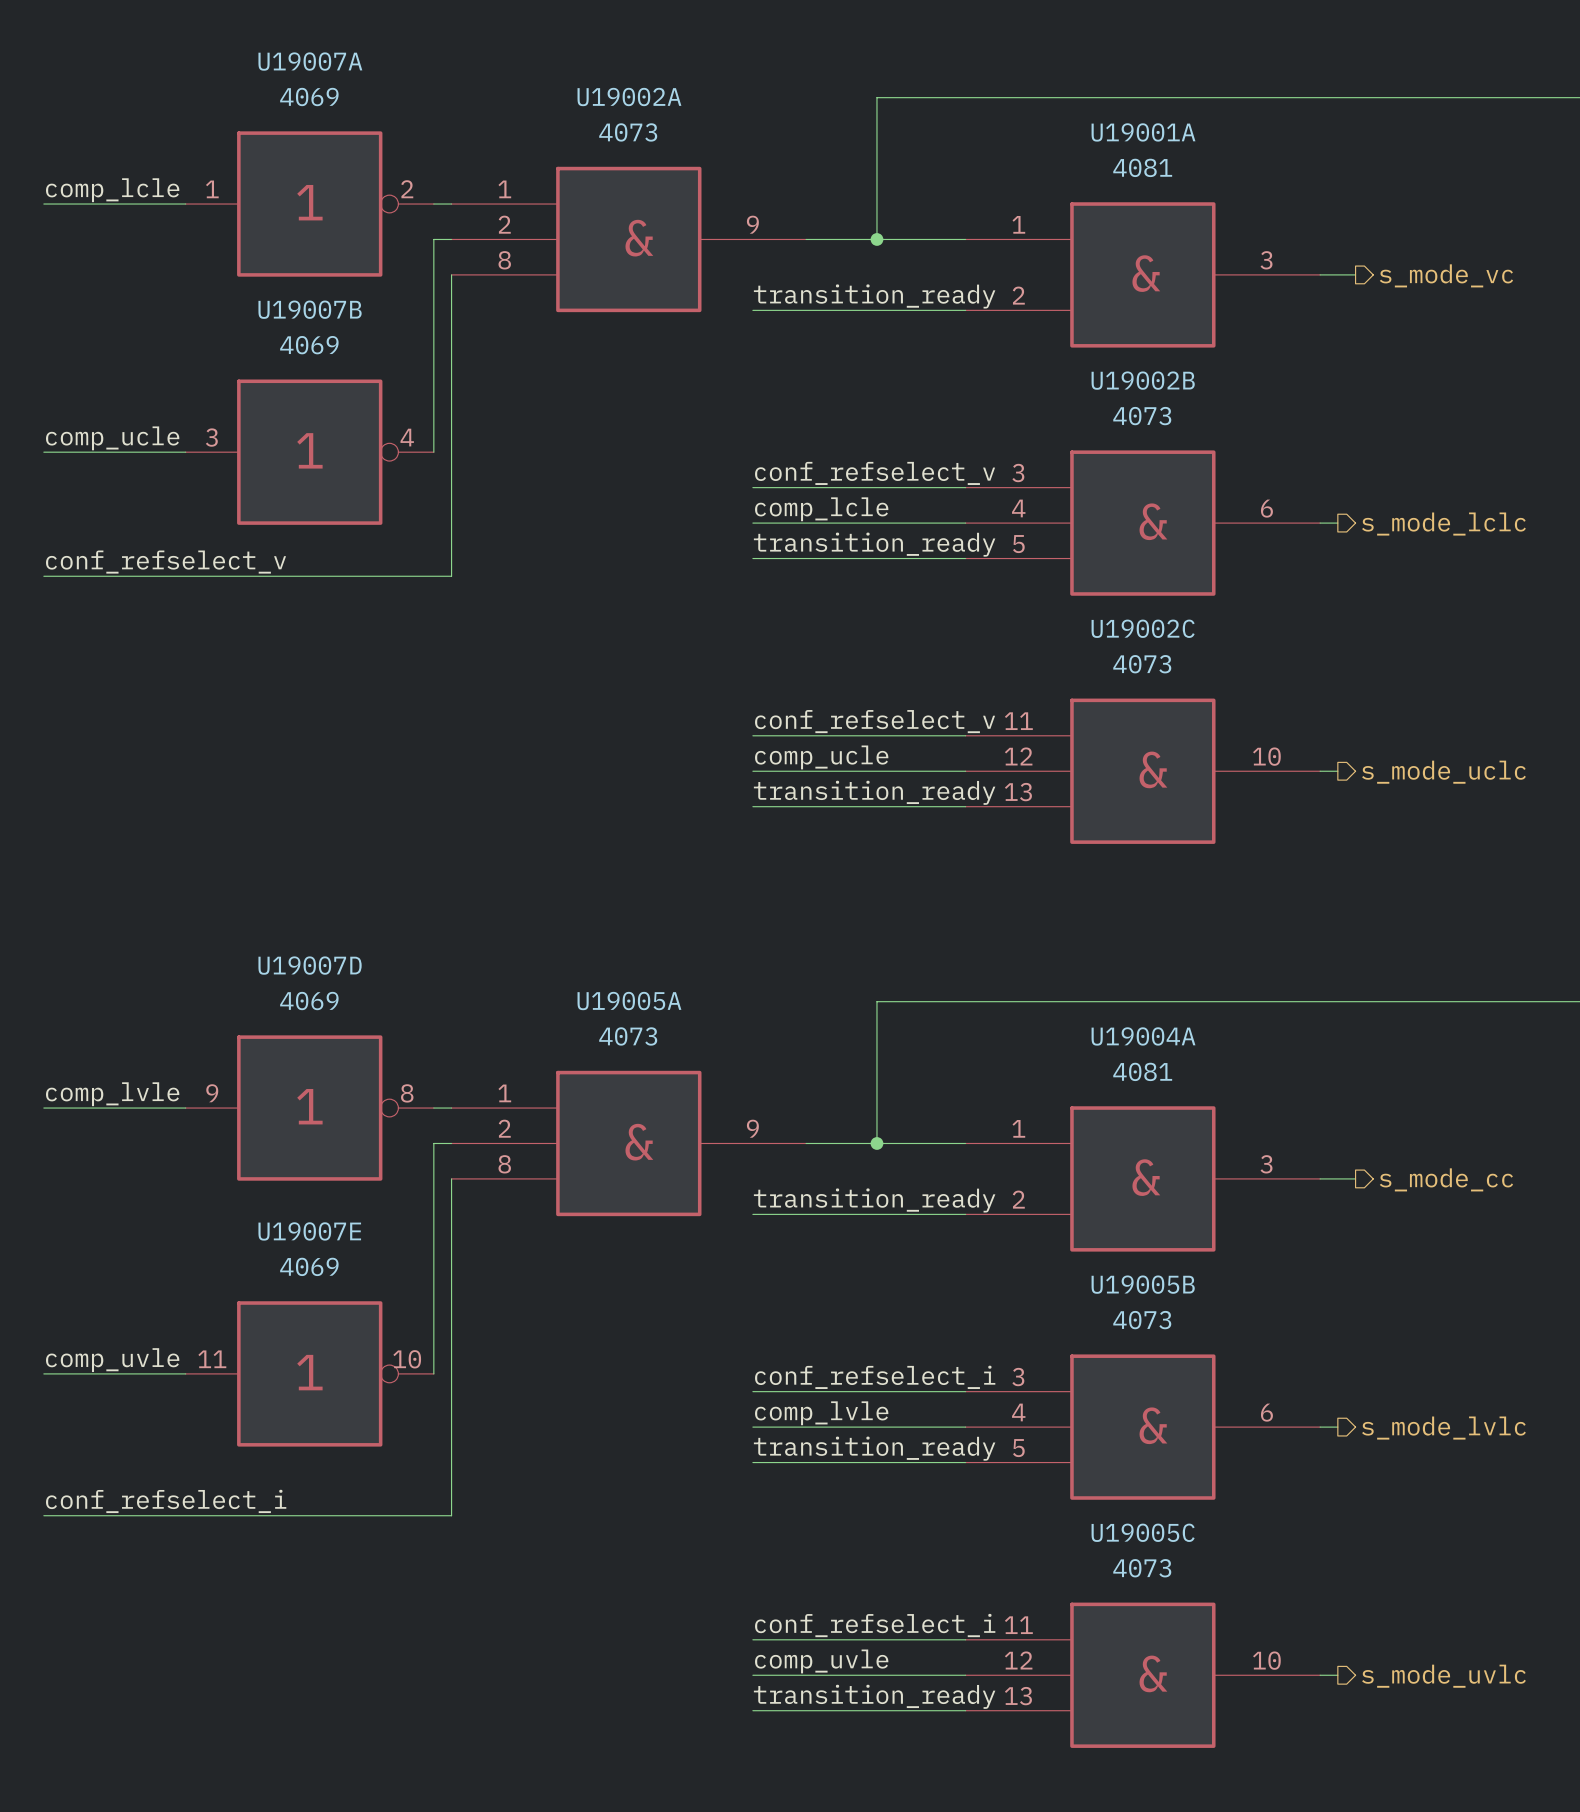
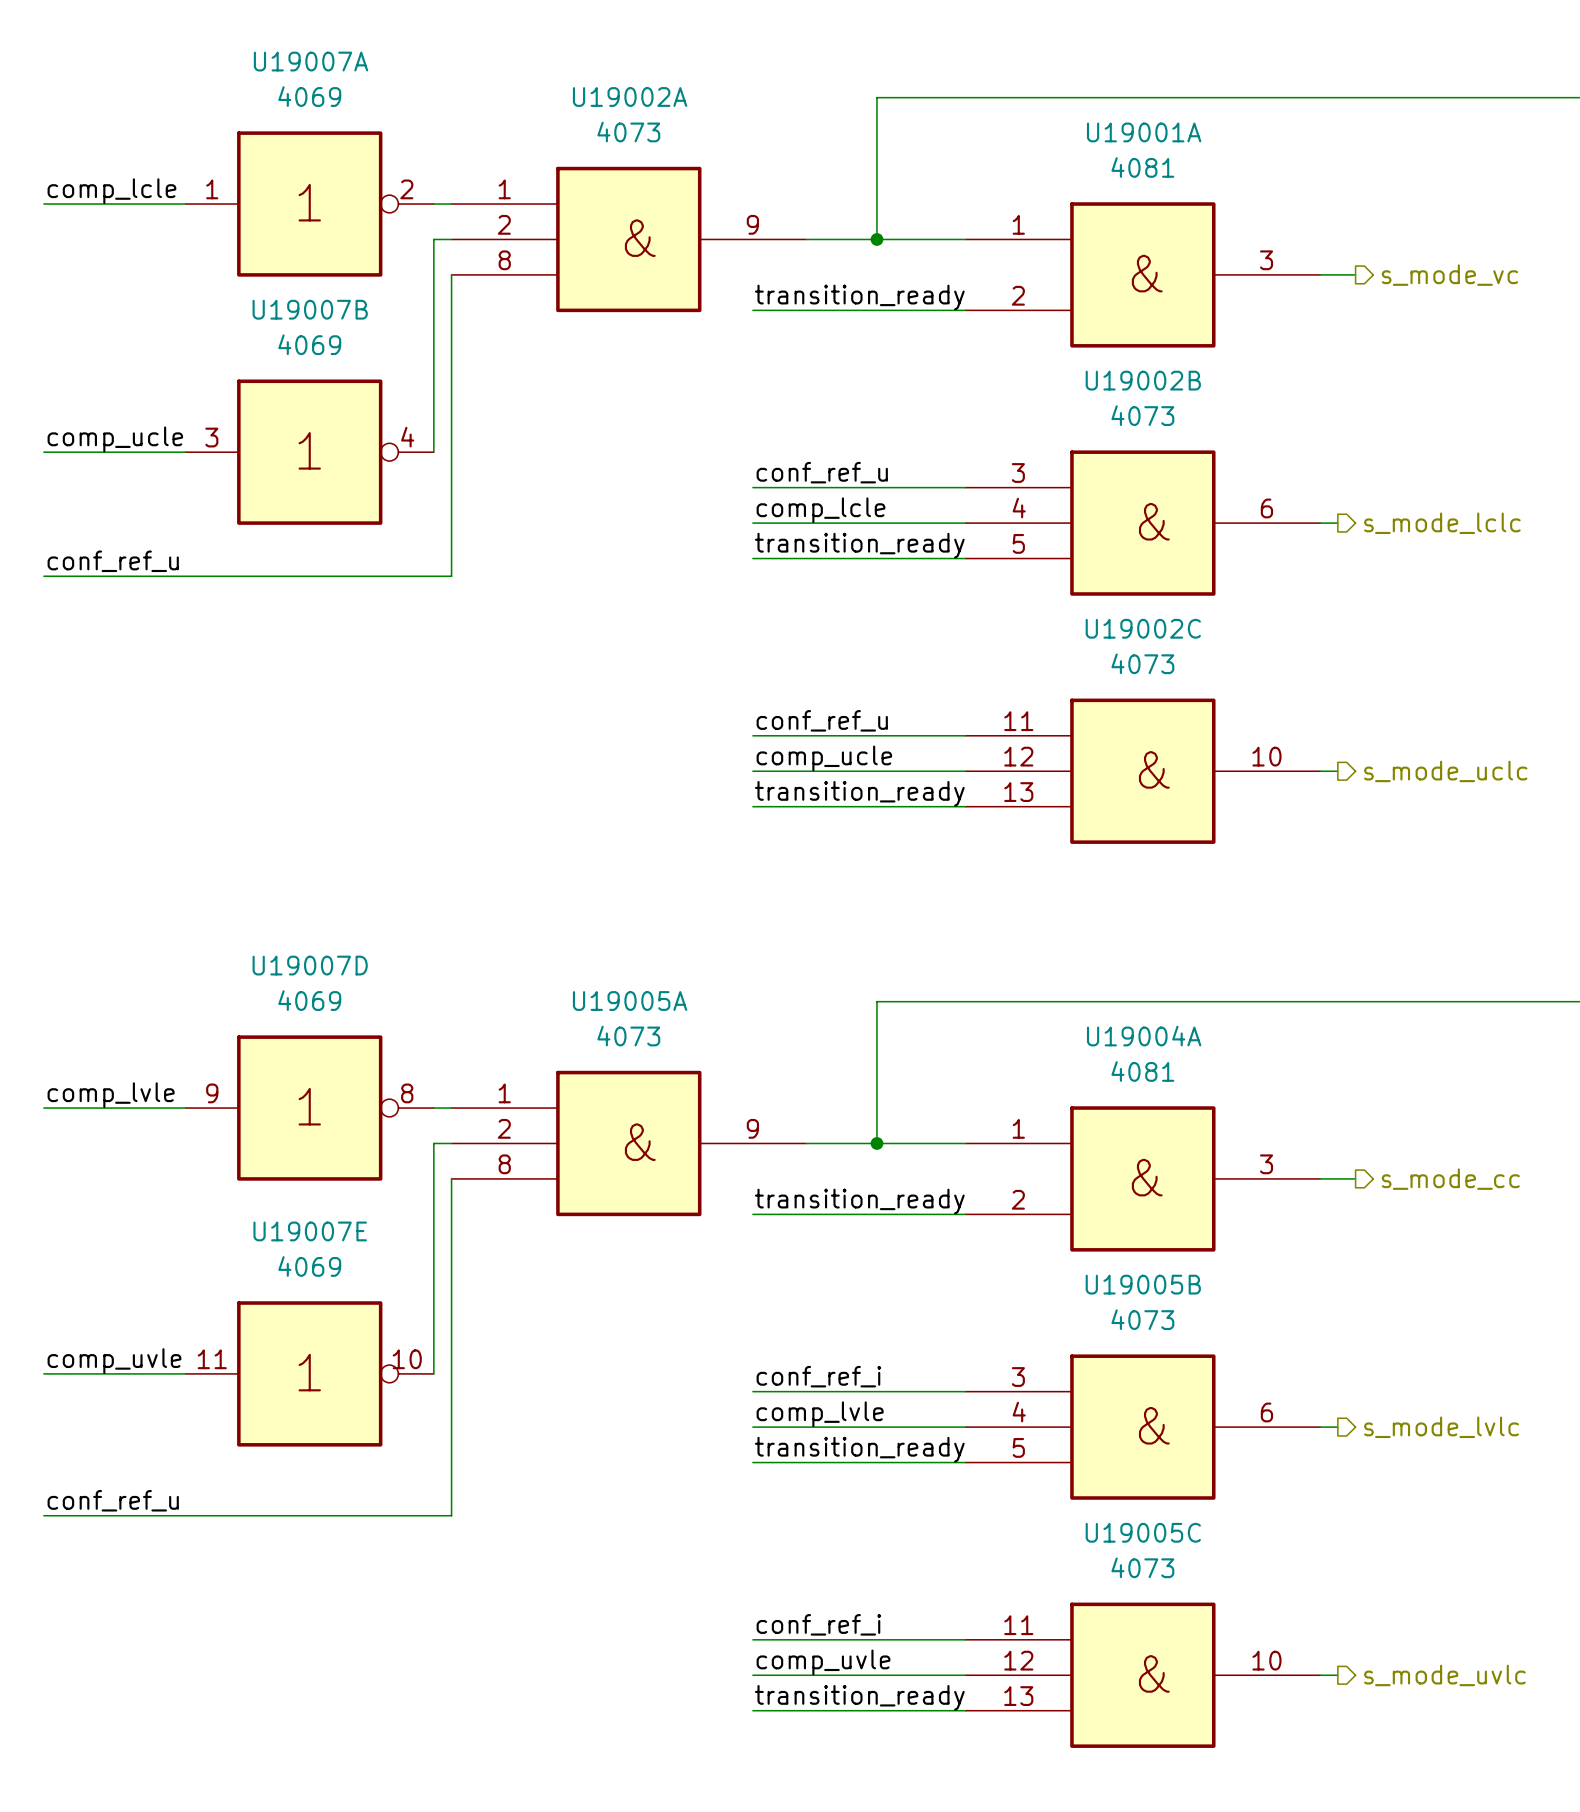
label: conf_refselect_v (875, 473) -> conf_ref_u (822, 472)
label: conf_refselect_v (166, 562) -> conf_ref_u (113, 561)
label: conf_refselect_v (875, 721) -> conf_ref_u (822, 720)
label: conf_refselect_i (875, 1377) -> conf_ref_i (818, 1376)
label: conf_refselect_i (166, 1501) -> conf_ref_u (113, 1500)
label: conf_refselect_i (875, 1625) -> conf_ref_i (818, 1624)

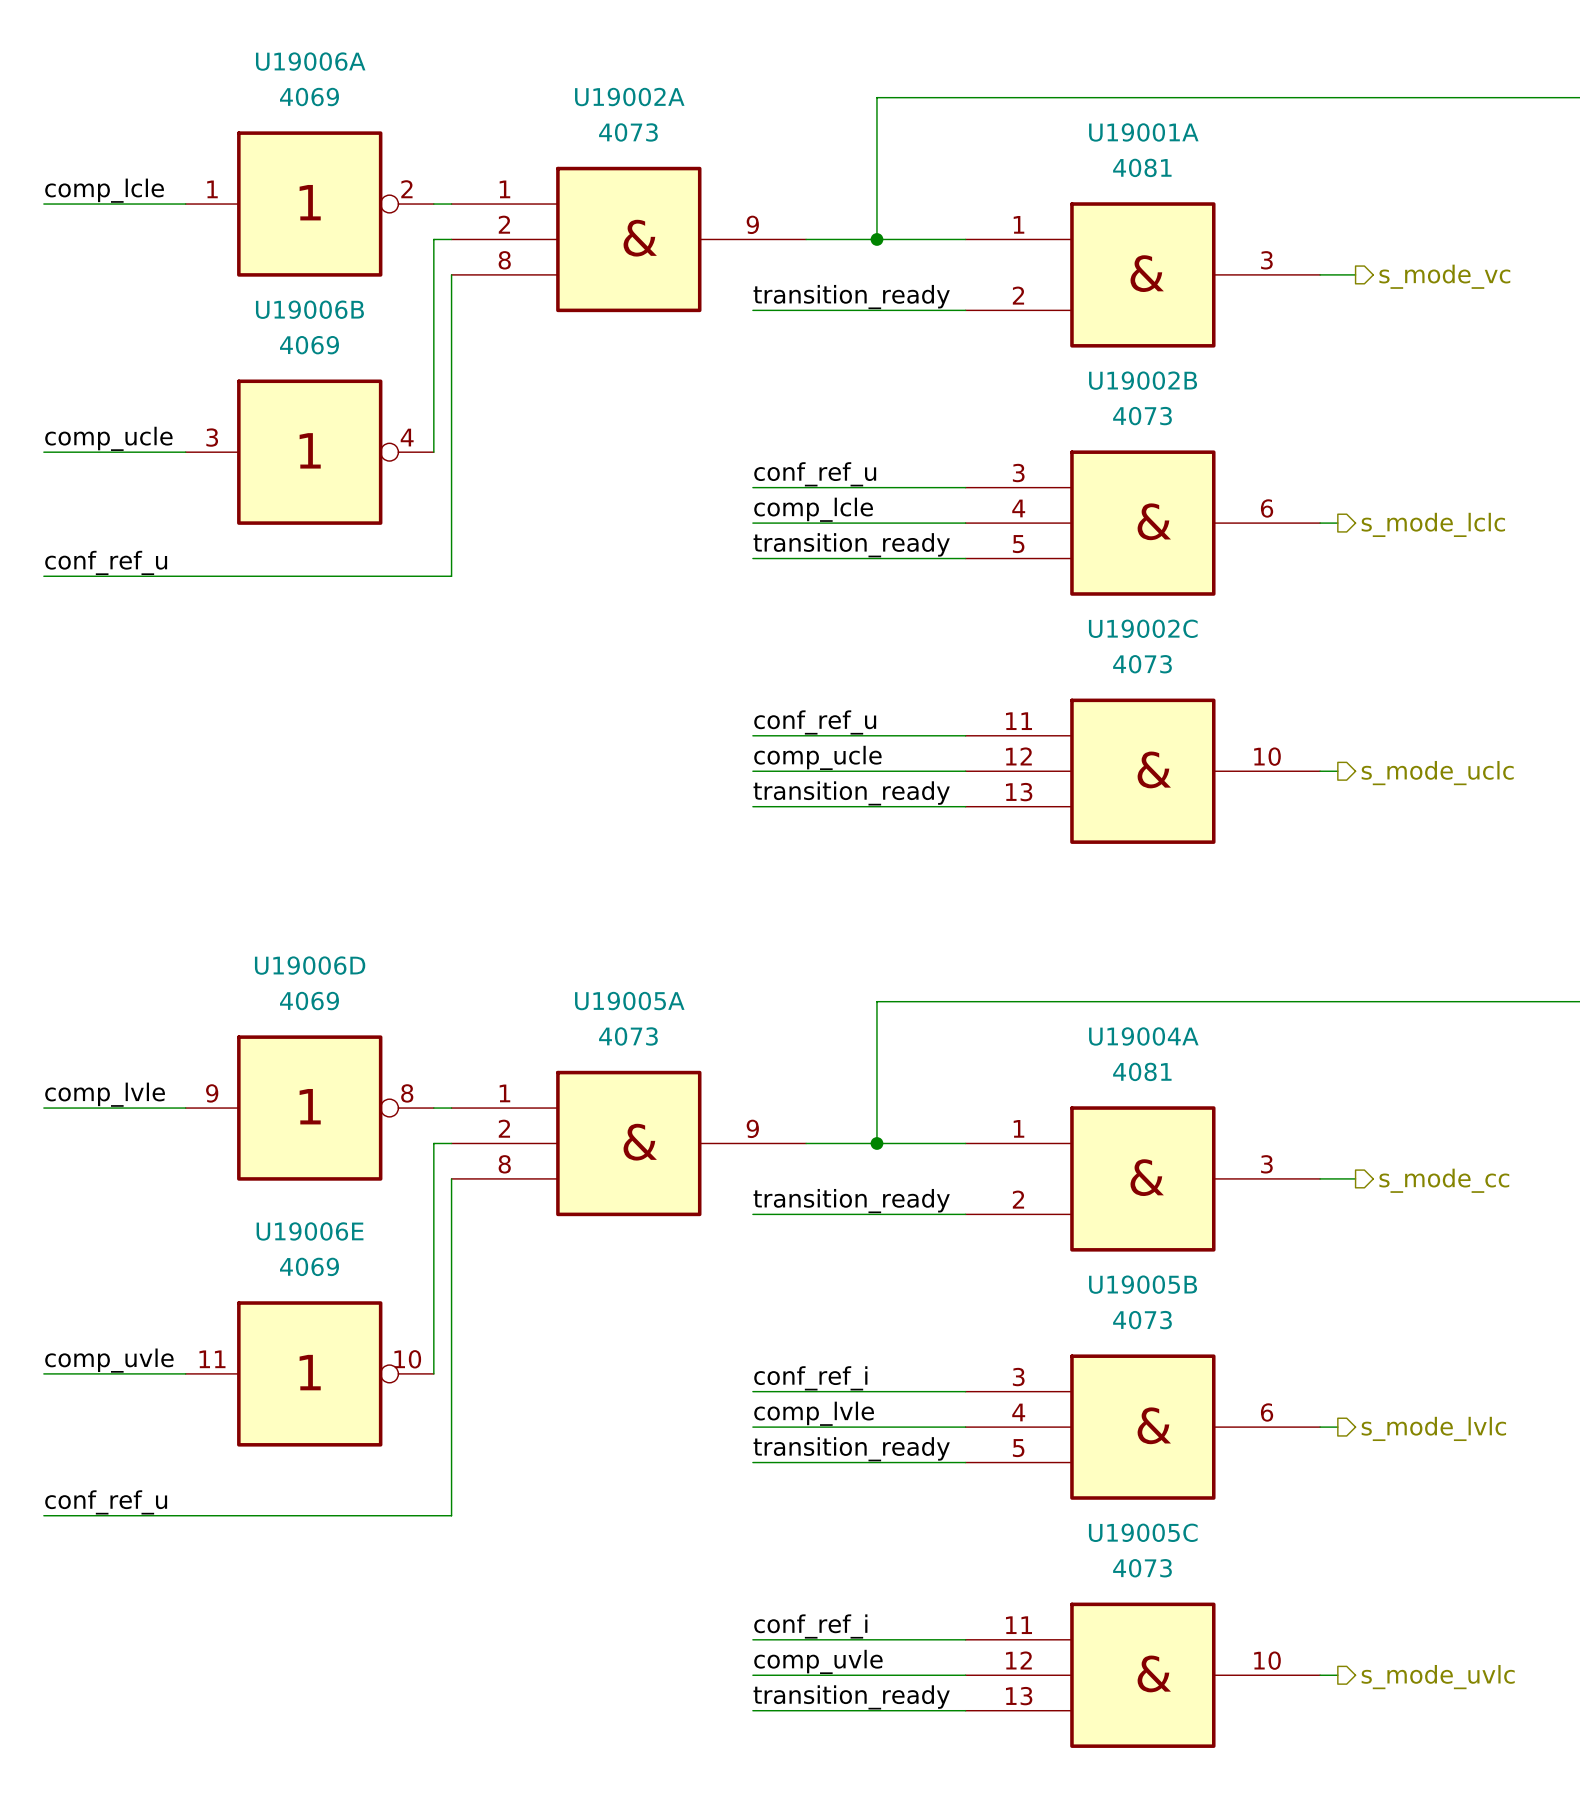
U19007A name: U19007A (311, 61) -> U19006A (310, 61)
U19007B name: U19007B (310, 309) -> U19006B (309, 309)
U19007D name: U19007D (310, 965) -> U19006D (310, 965)
U19007E name: U19007E (310, 1231) -> U19006E (310, 1231)

